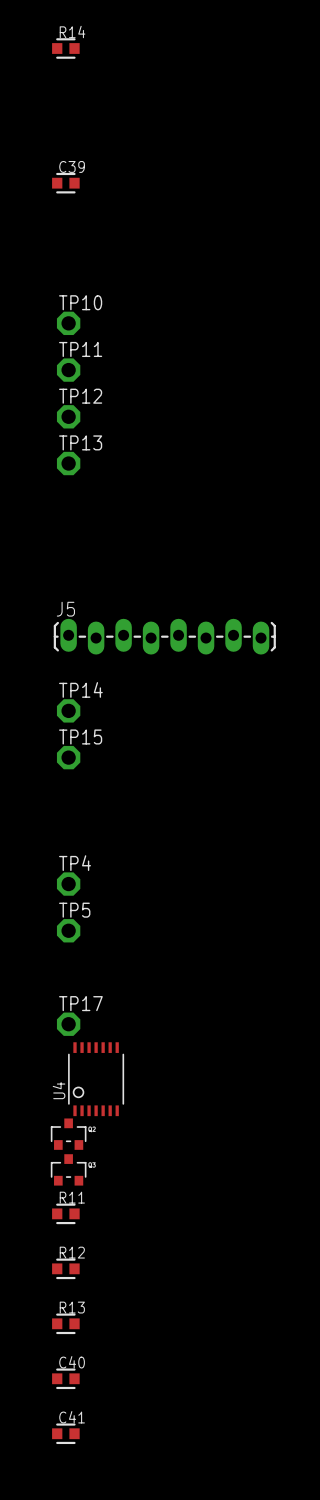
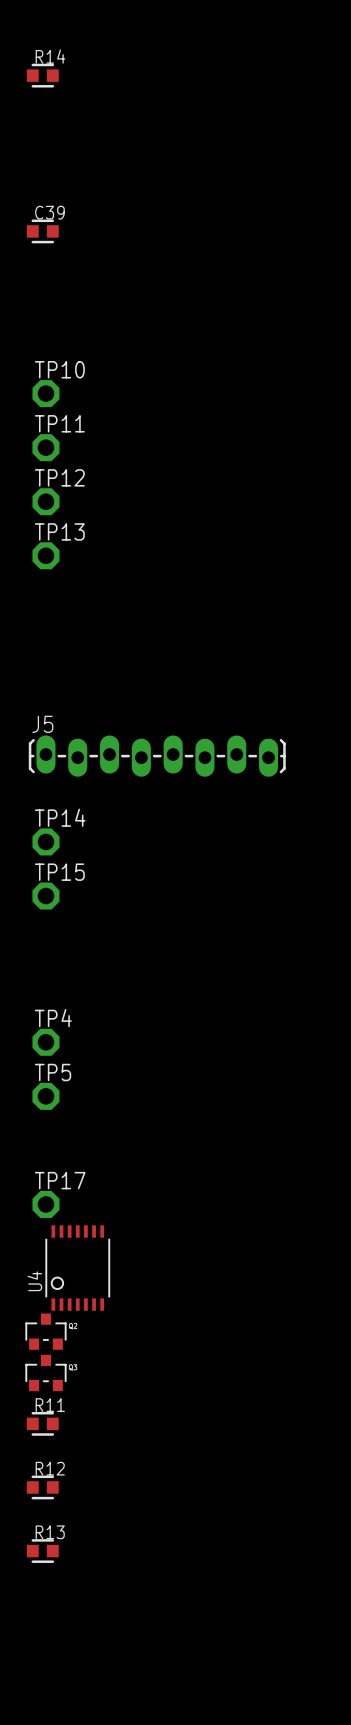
C40: (65, 1378) -> none
C41: (65, 1433) -> none

